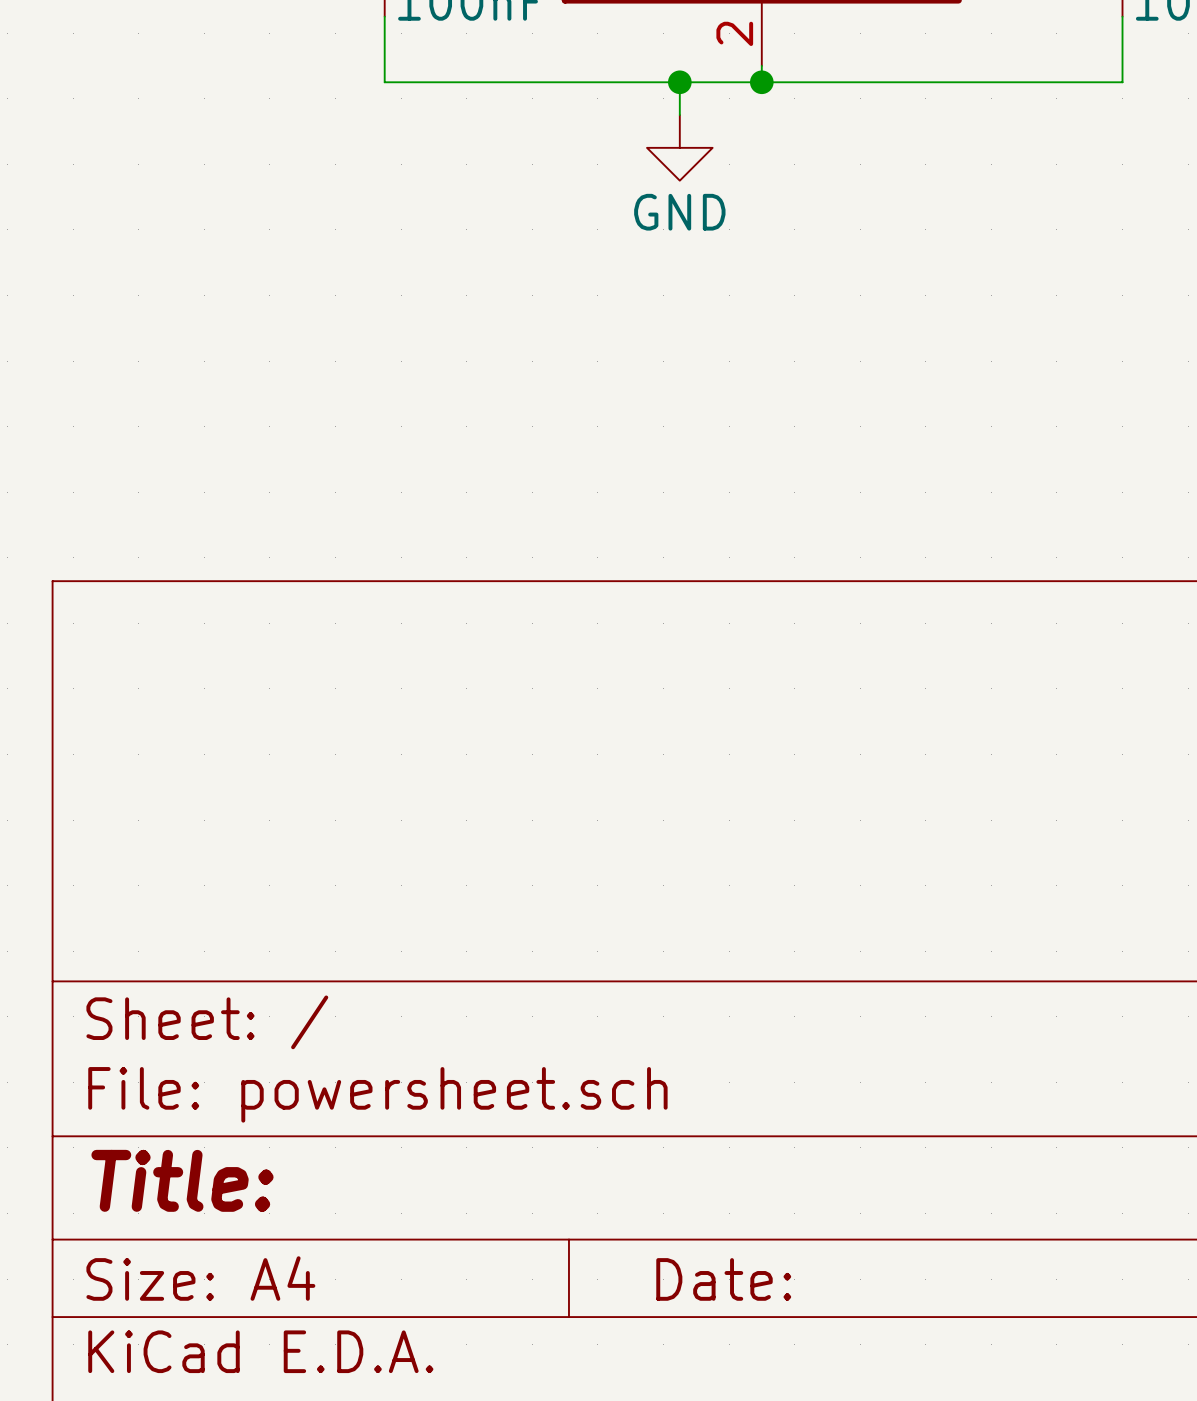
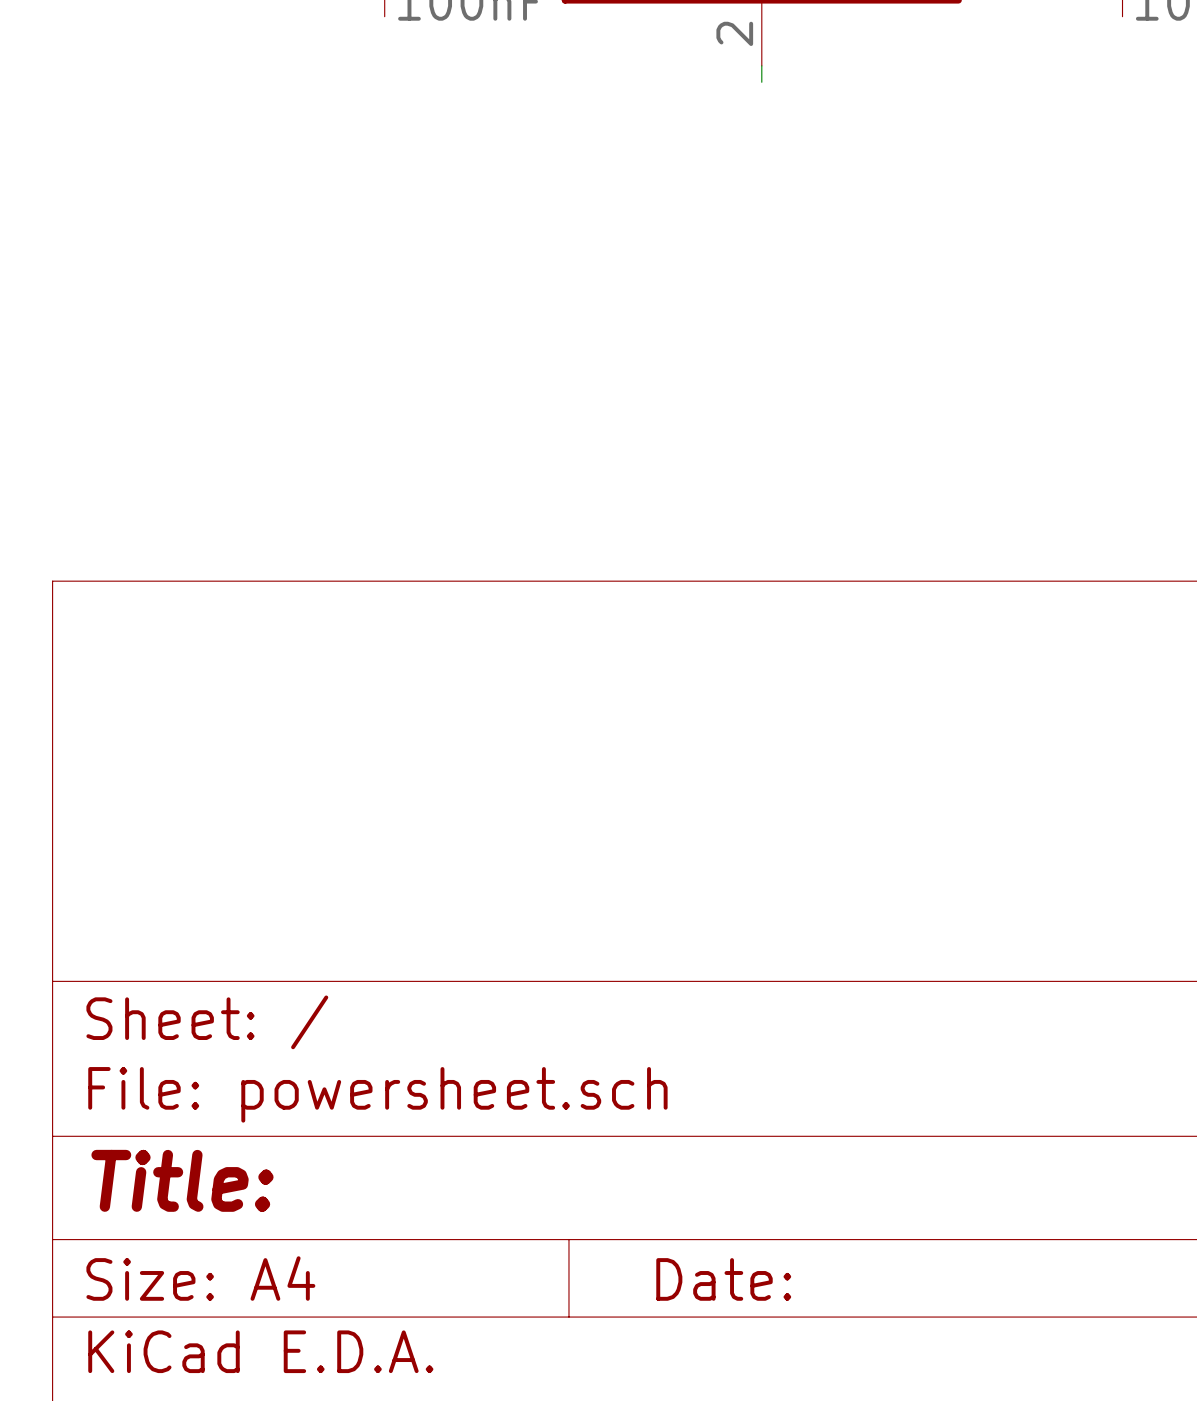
wire: (384, 16) (384, 82) (1122, 82) (1122, 16) -> none
wire: (679, 82) (679, 115) -> none
junction: (679, 82) -> none
junction: (761, 82) -> none
power symbol: GND (679, 147) -> none

